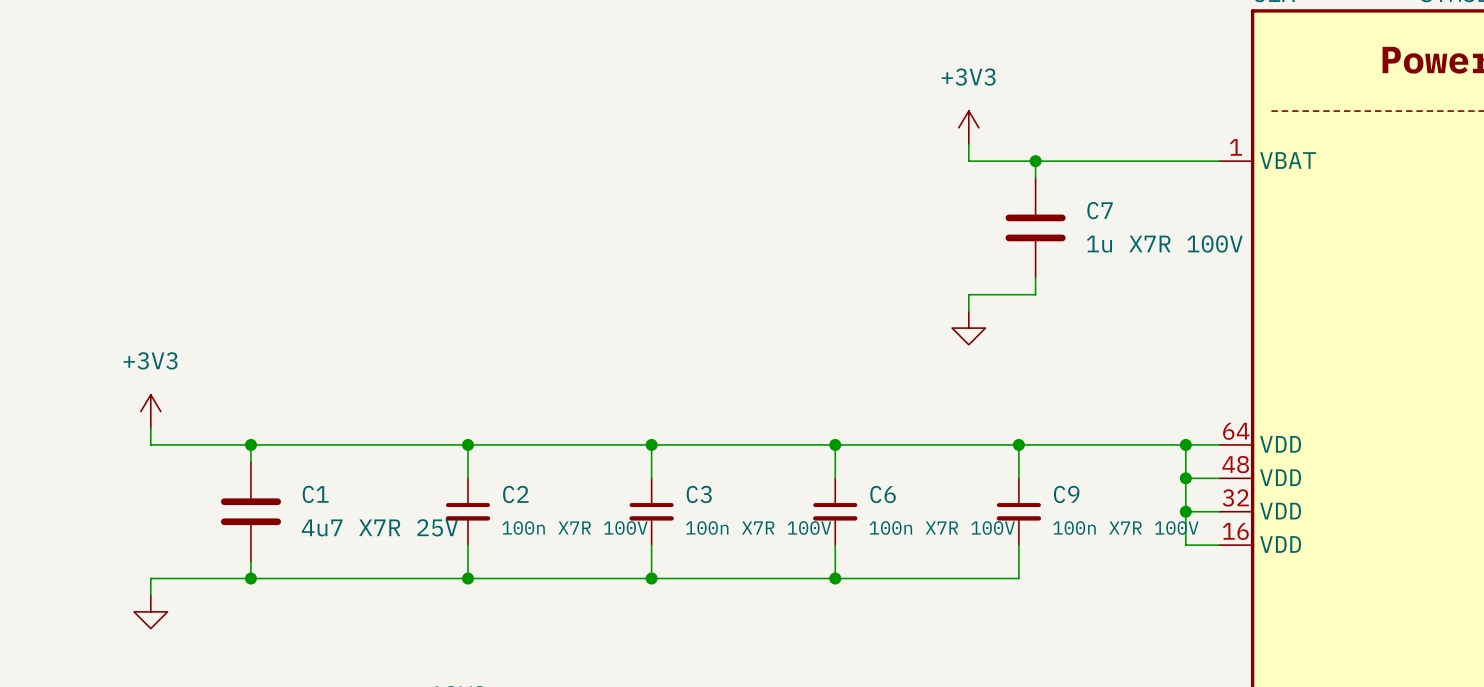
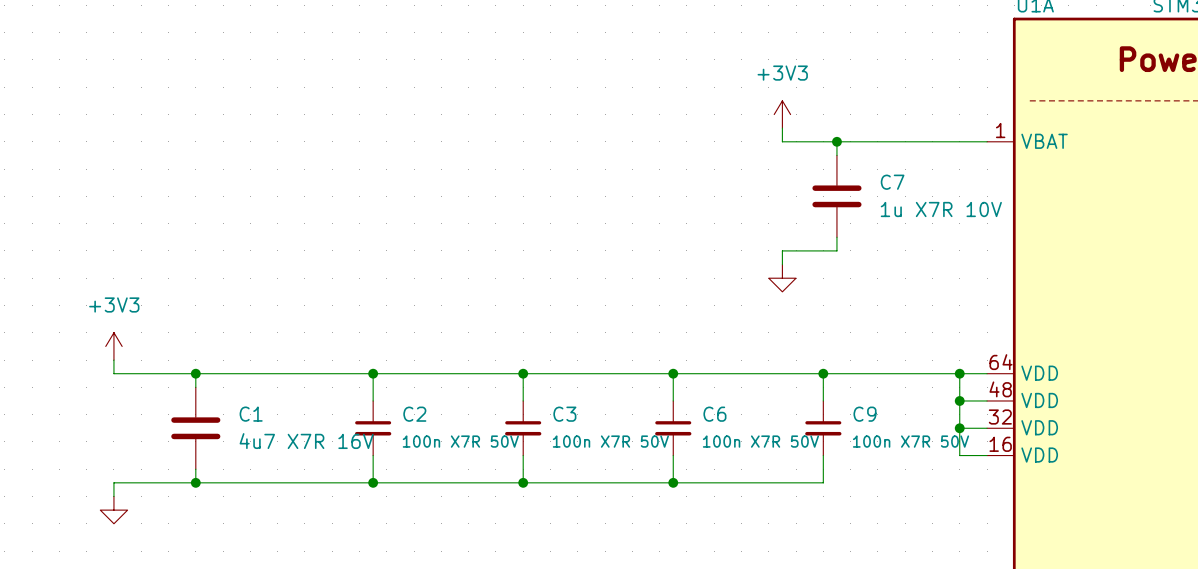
C7 value: 1u X7R 100V (1164, 244) -> 1u X7R 10V (941, 209)
C1 value: 4u7 X7R 25V (379, 527) -> 4u7 X7R 16V (306, 441)
C2 value: 100n X7R 100V (574, 528) -> 100n X7R 50V (460, 441)
C3 value: 100n X7R 100V (758, 528) -> 100n X7R 50V (610, 441)
C6 value: 100n X7R 100V (942, 528) -> 100n X7R 50V (760, 441)
C9 value: 100n X7R 100V (1125, 528) -> 100n X7R 50V (911, 441)

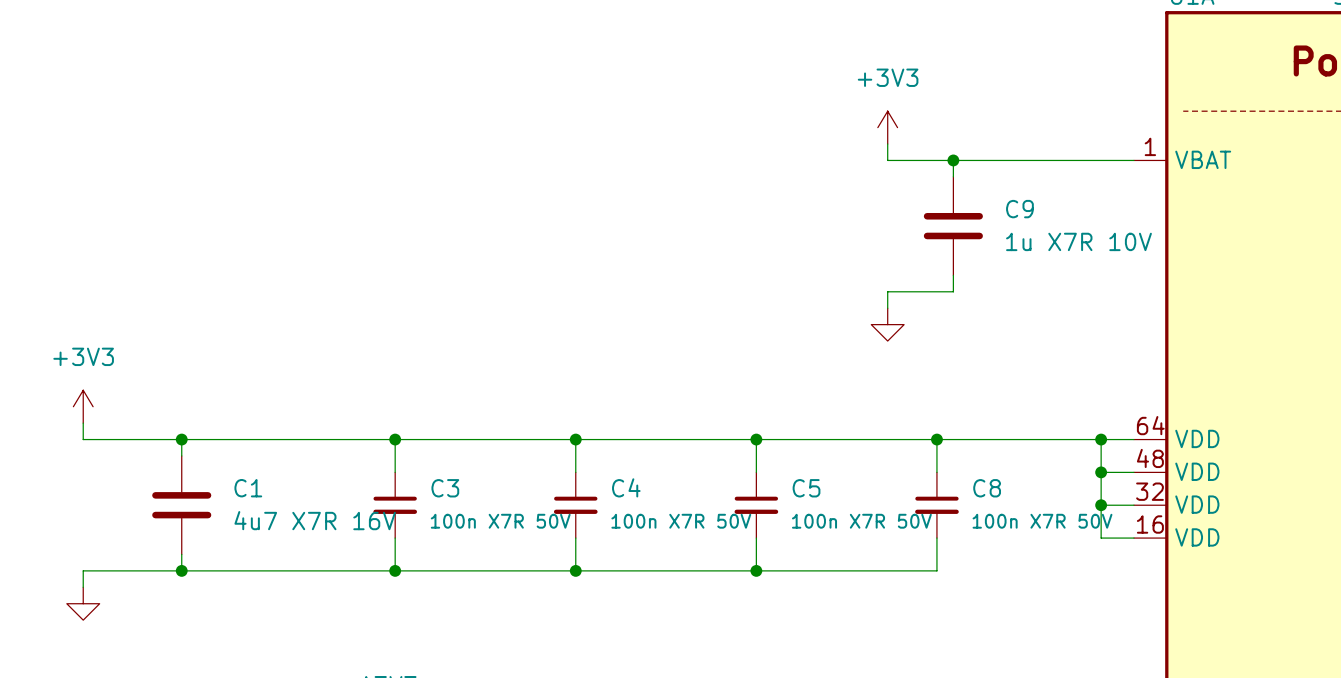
C7 name: C7 (892, 182) -> C9 (1019, 209)
C2 name: C2 (414, 414) -> C3 (445, 488)
C3 name: C3 (564, 414) -> C4 (626, 487)
C6 name: C6 (714, 414) -> C5 (806, 488)
C9 name: C9 (865, 414) -> C8 (987, 488)

